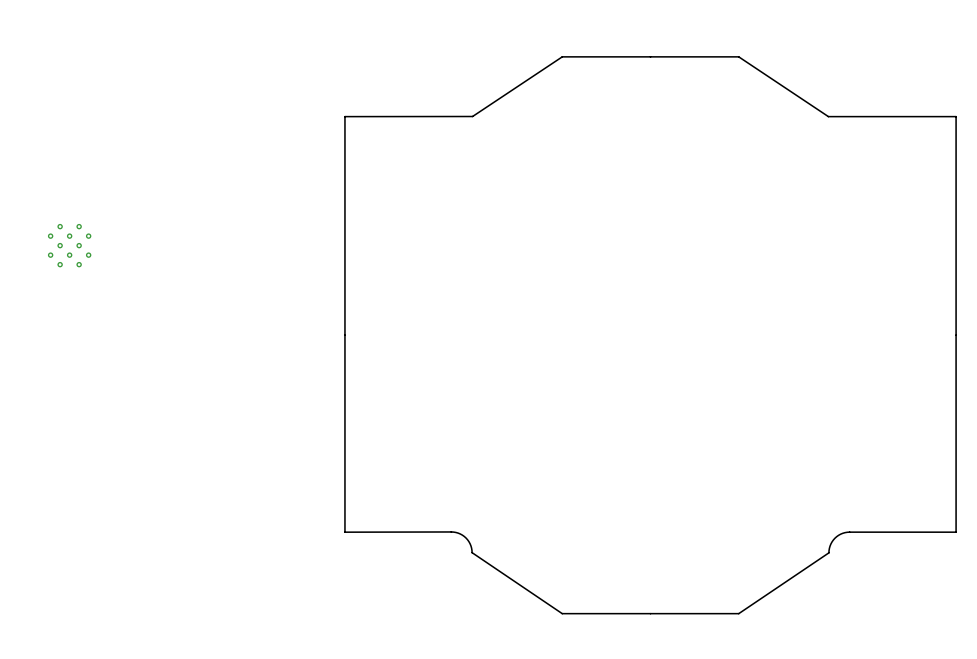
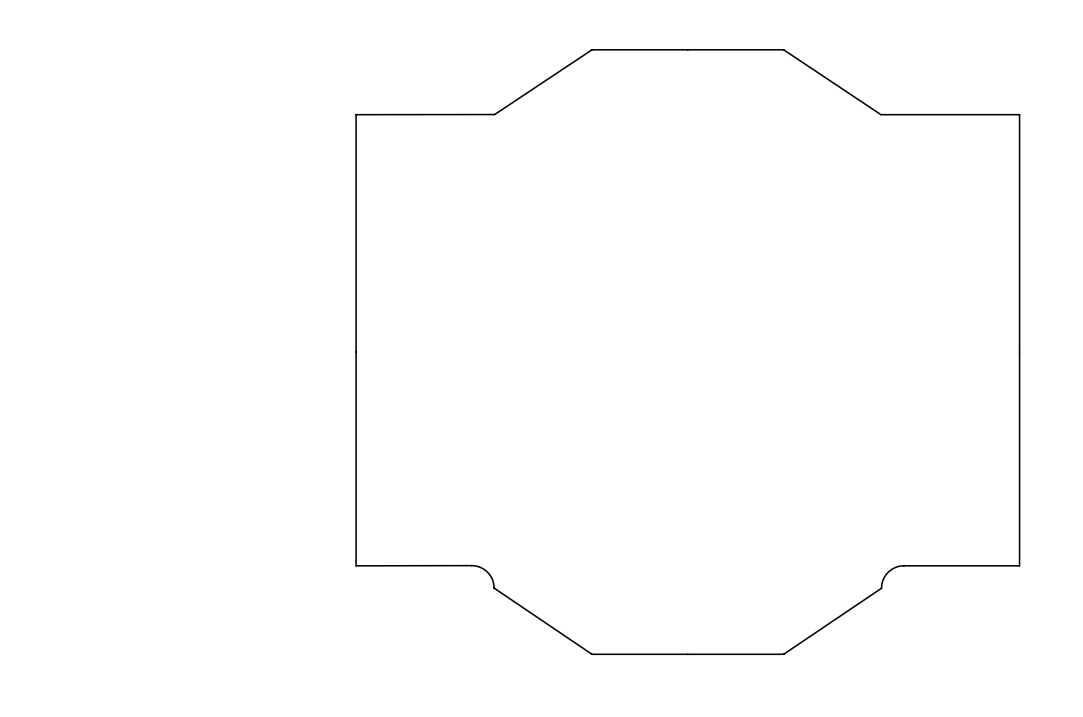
part: (69, 245) -> none

